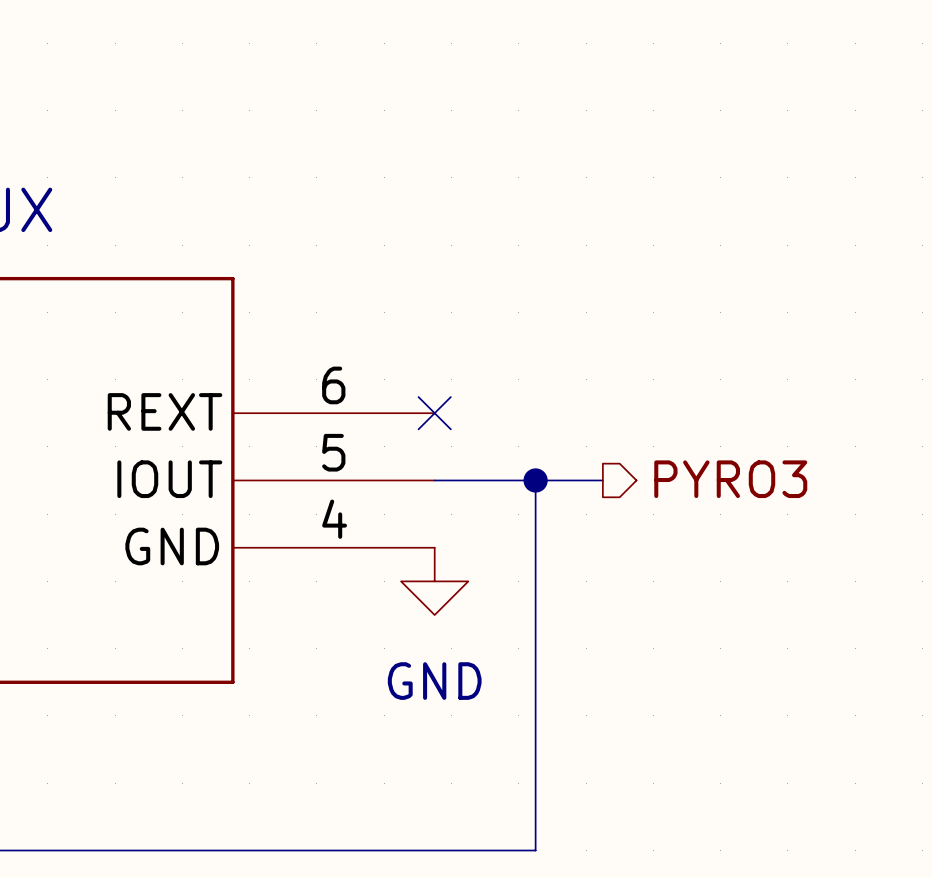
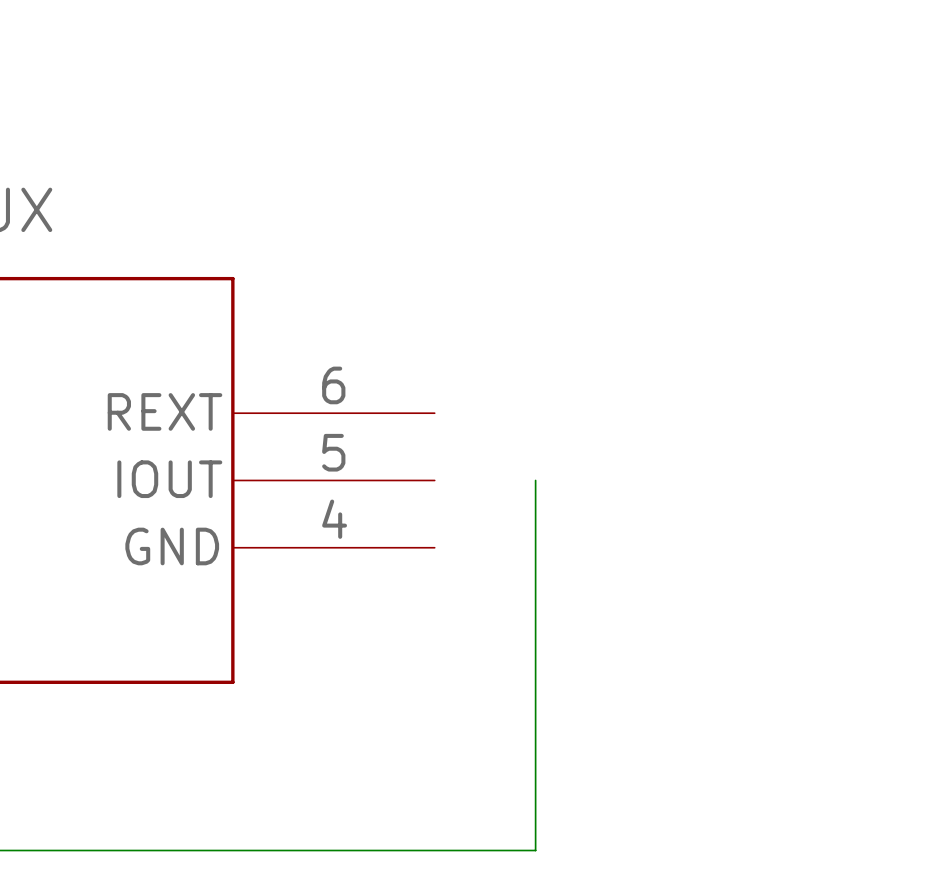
no-connect mark: (434, 413) -> none
hierarchical label: PYRO3 (730, 479) -> none
wire: (434, 480) (602, 480) -> none
junction: (535, 480) -> none
power symbol: GND (434, 581) -> none

